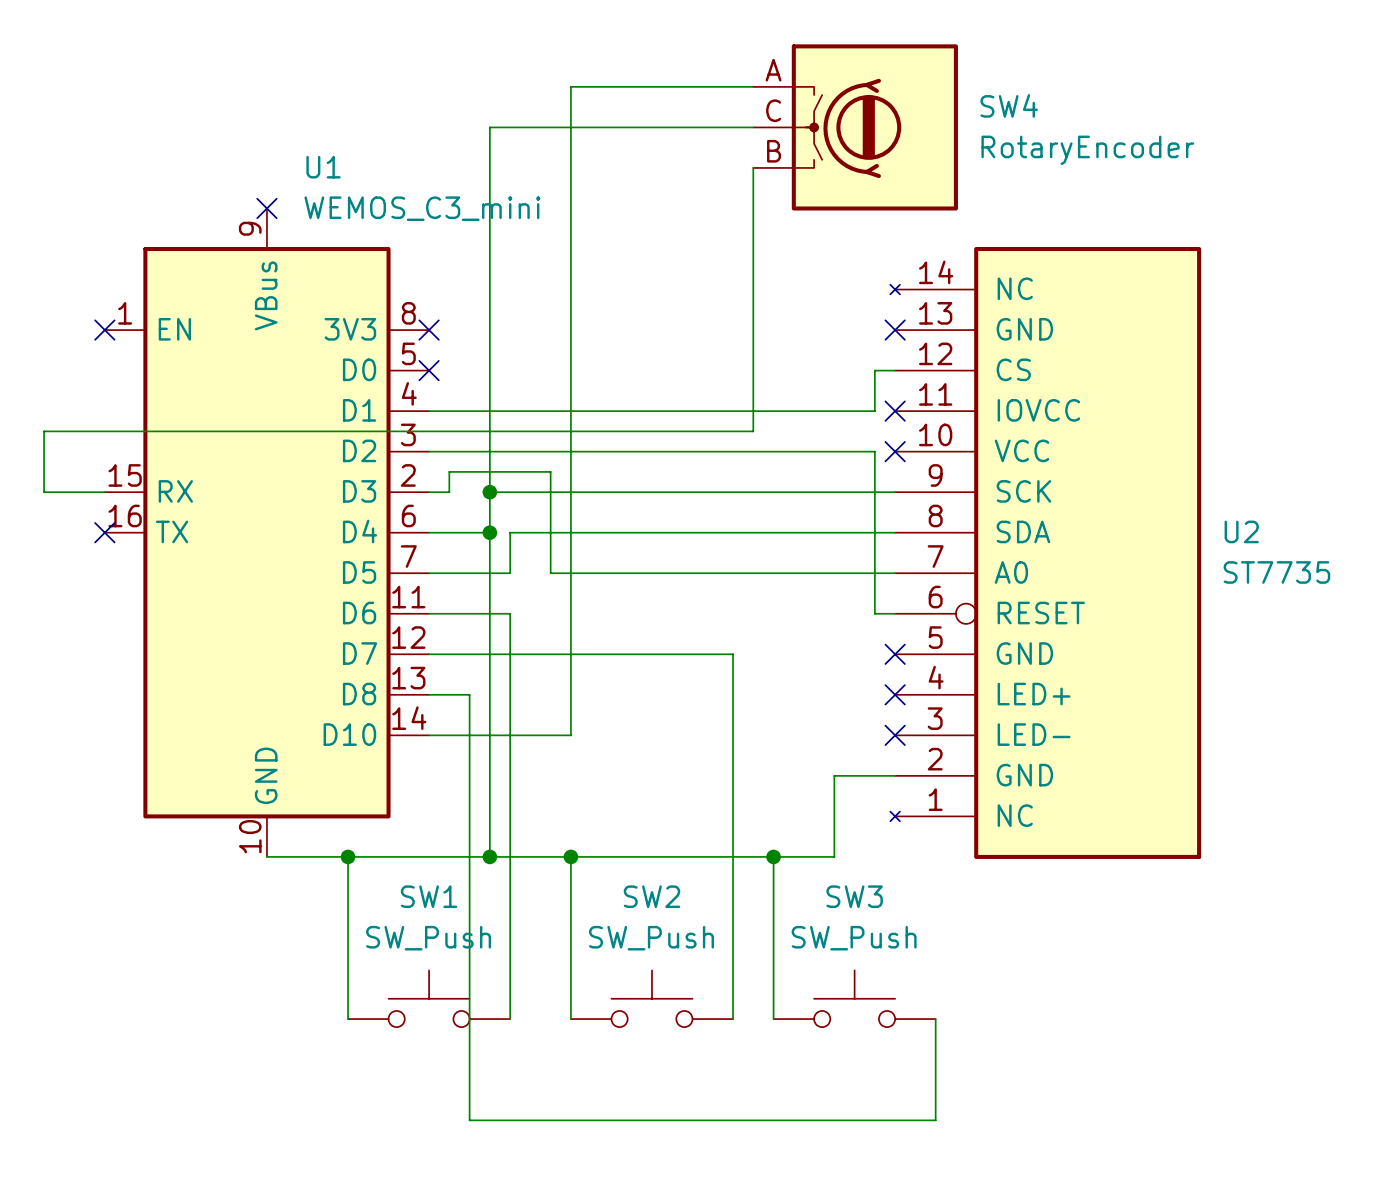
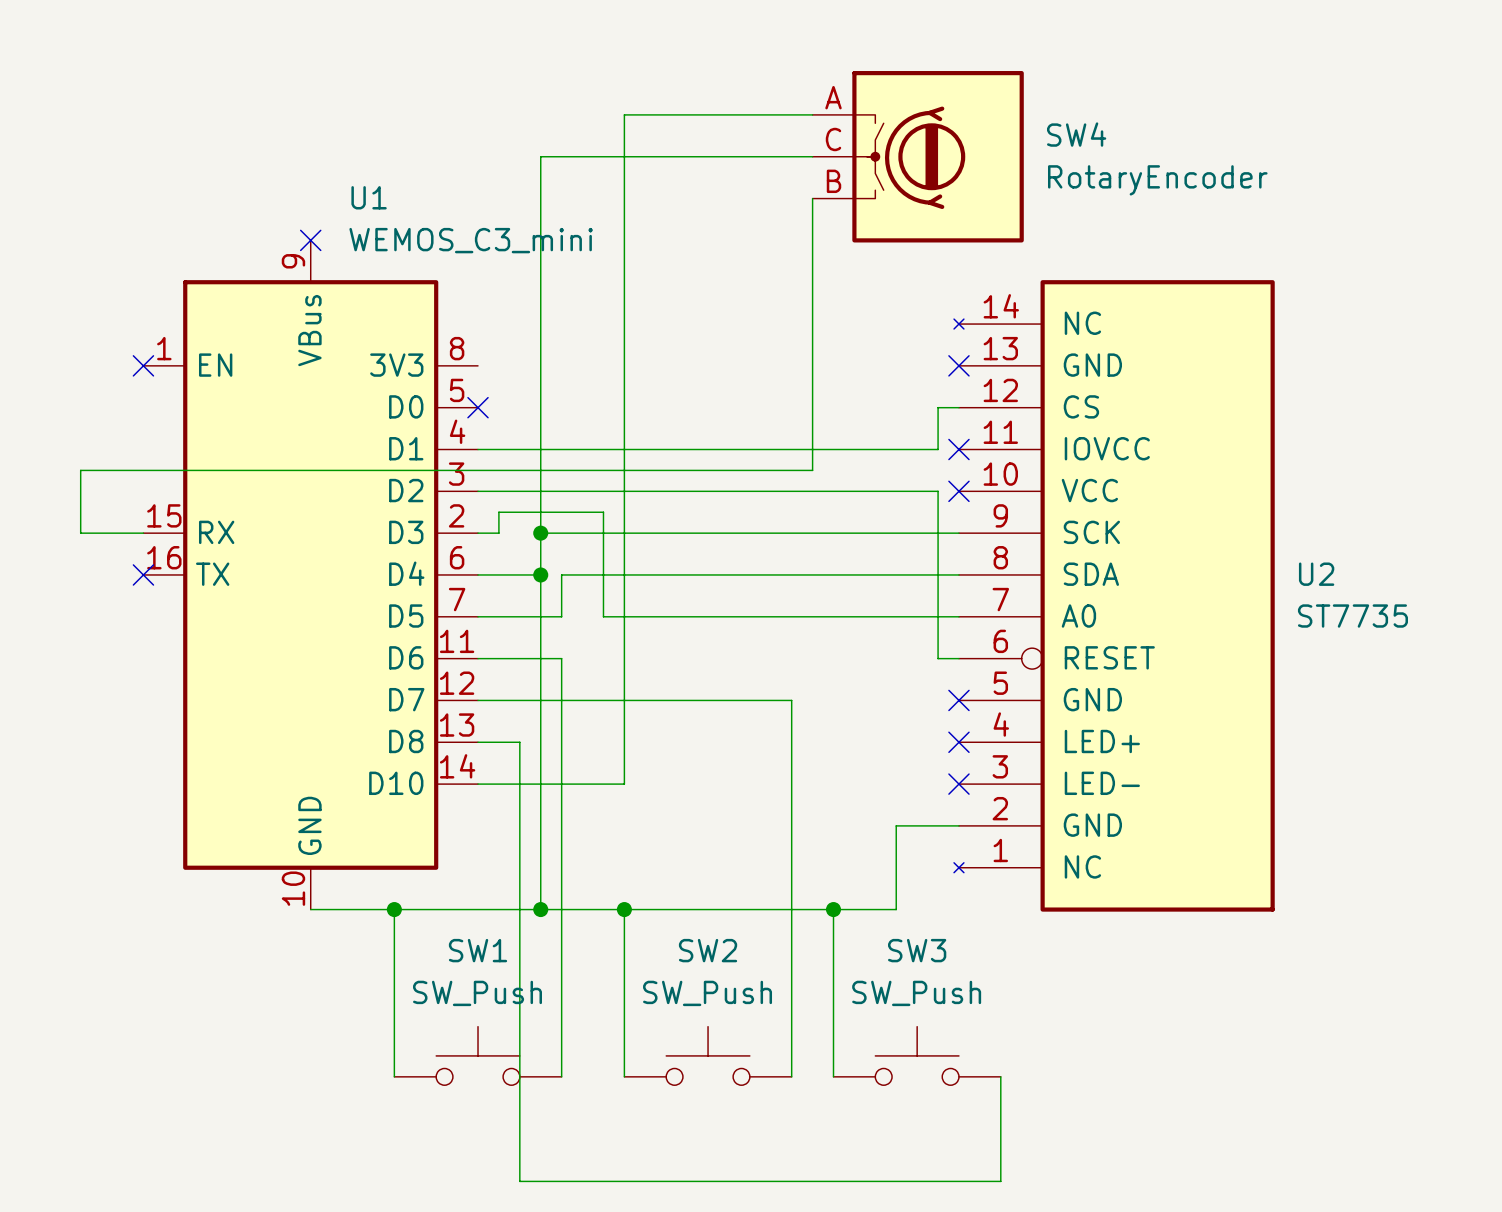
no-connect mark: (429, 330) -> none

